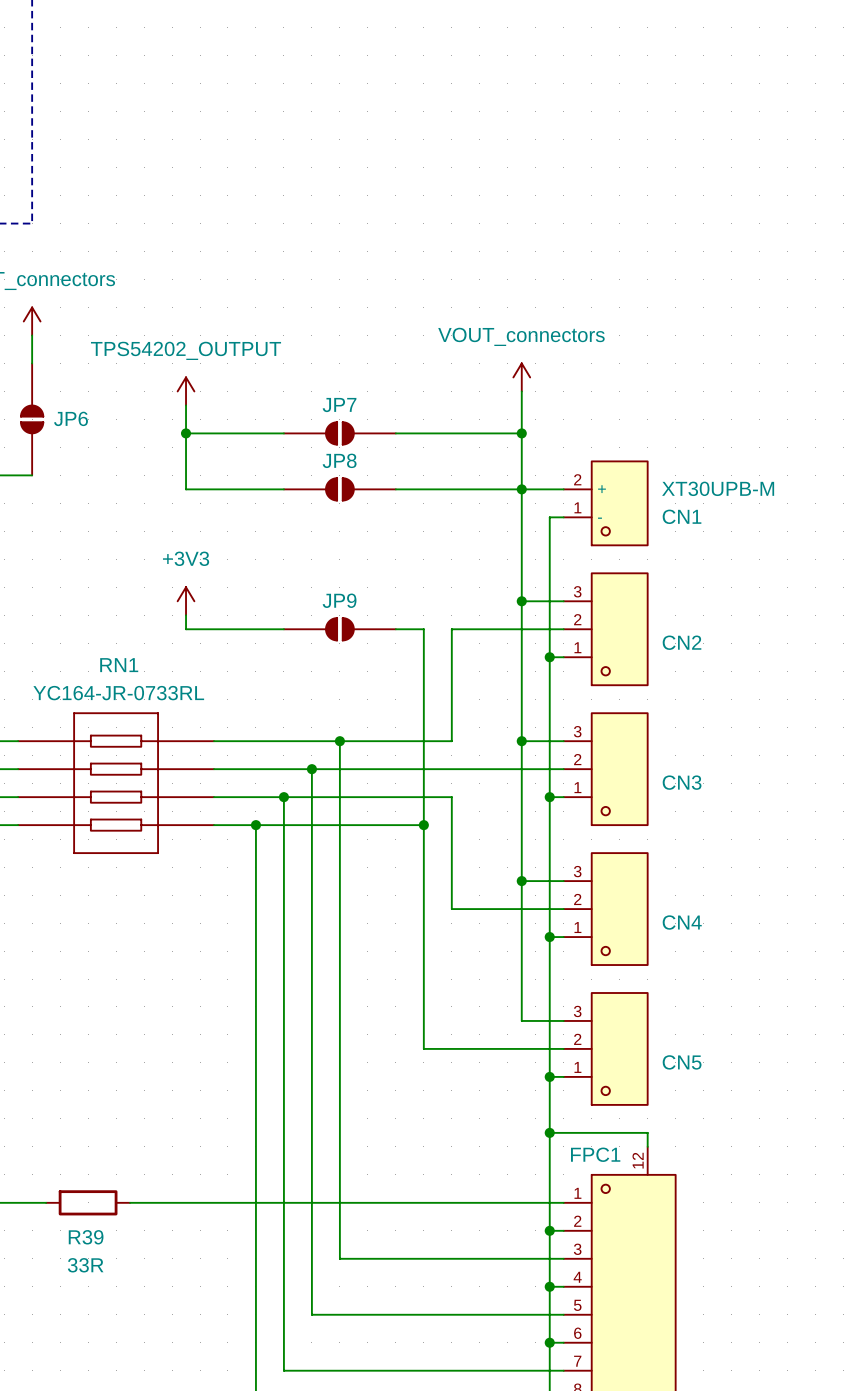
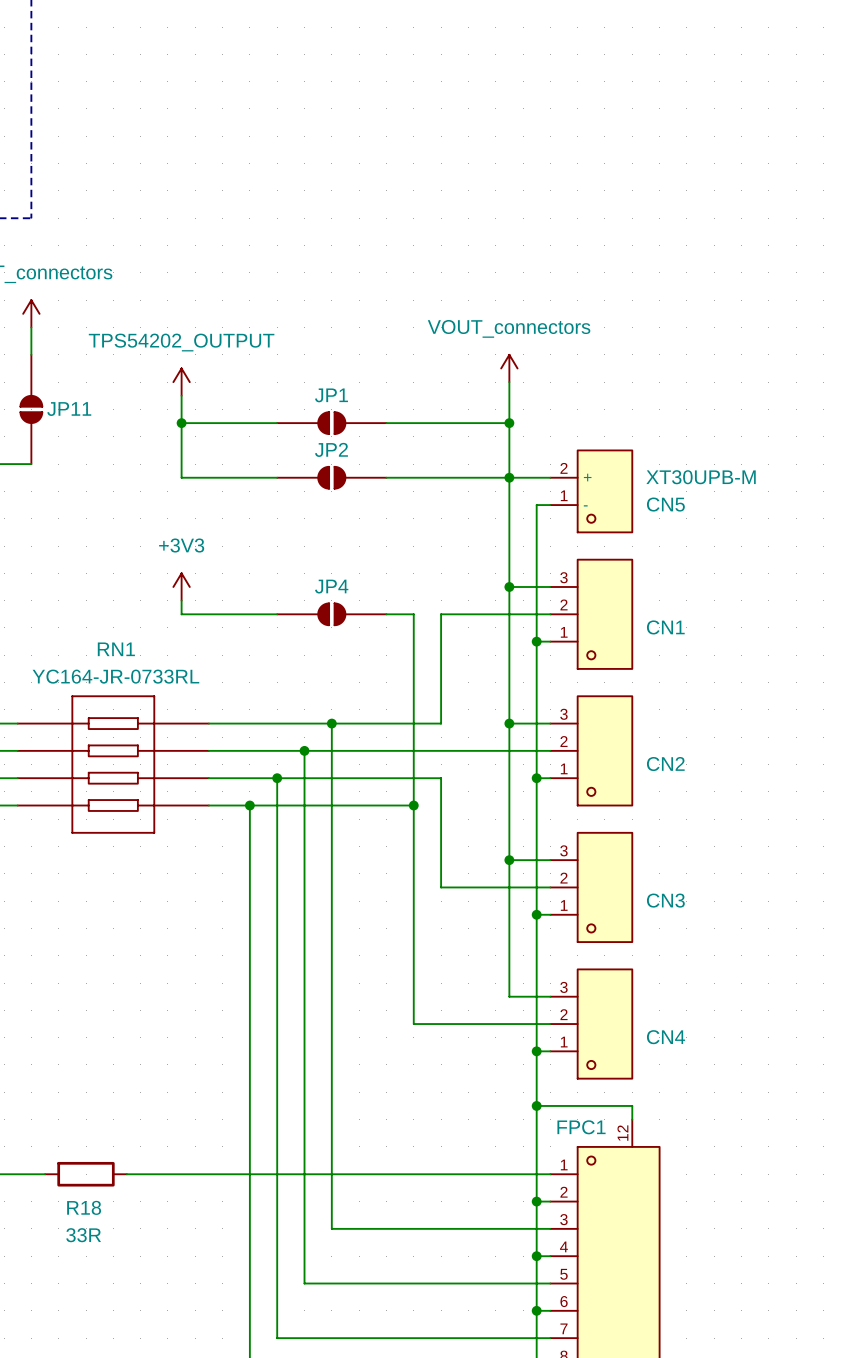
JP7 name: JP7 (339, 405) -> JP1 (331, 395)
JP6 name: JP6 (71, 418) -> JP11 (69, 409)
JP8 name: JP8 (339, 460) -> JP2 (331, 449)
CN1 name: CN1 (682, 516) -> CN5 (665, 504)
JP9 name: JP9 (339, 600) -> JP4 (331, 586)
CN2 name: CN2 (682, 642) -> CN1 (665, 627)
CN3 name: CN3 (682, 782) -> CN2 (665, 764)
CN4 name: CN4 (682, 922) -> CN3 (665, 900)
CN5 name: CN5 (682, 1062) -> CN4 (666, 1037)
R39 name: R39 (86, 1237) -> R18 (84, 1207)

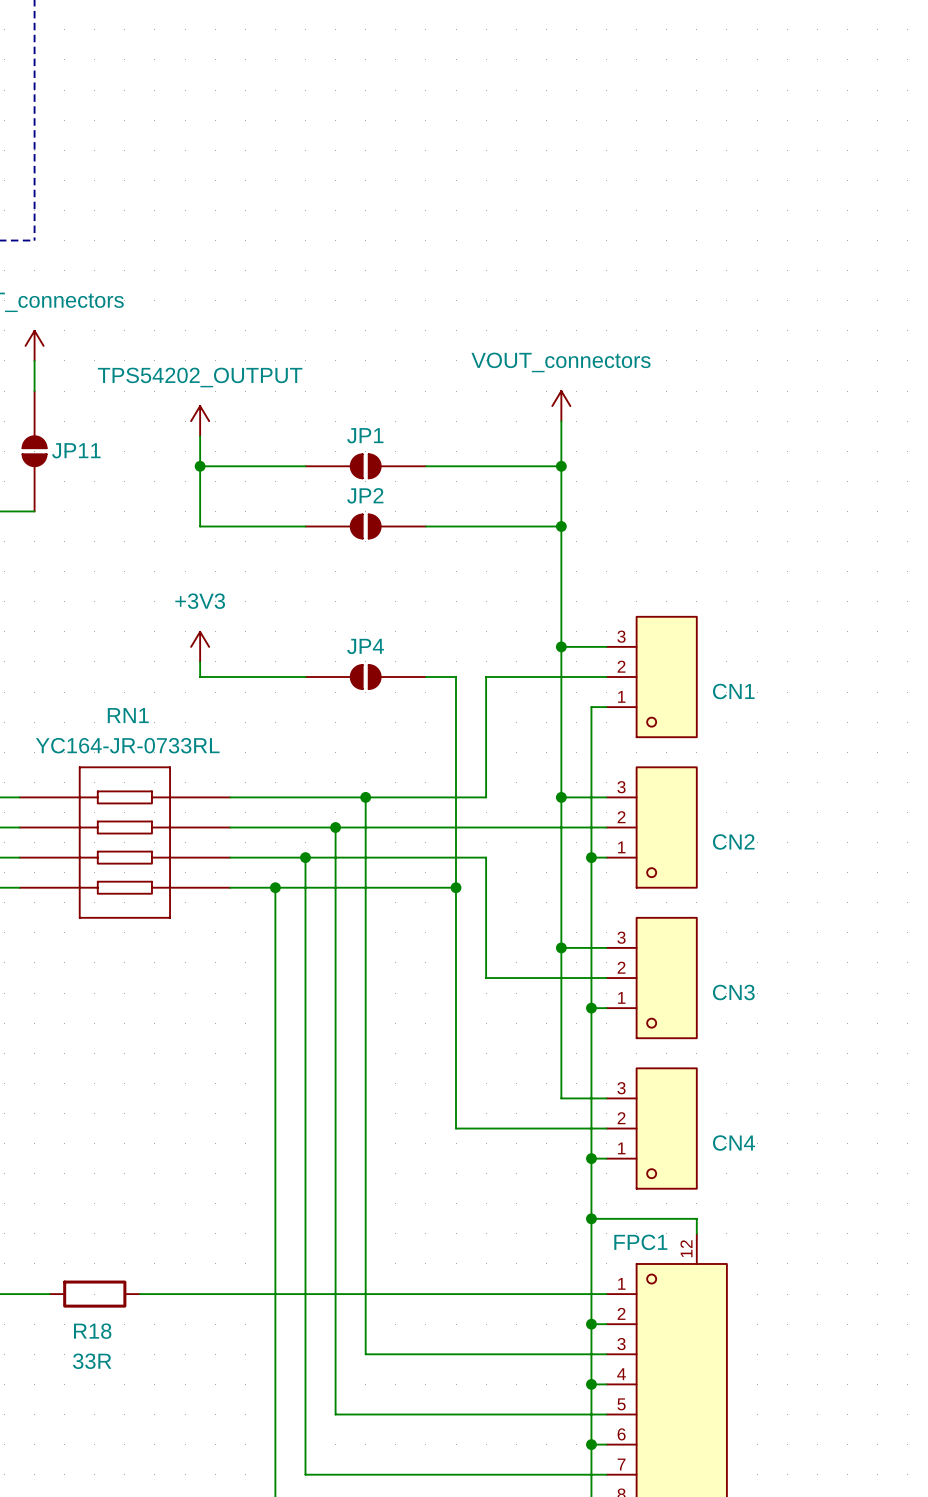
wire: (509, 477) (550, 477) -> none
CN5: XT30UPB-M (591, 491) -> none
wire: (550, 505) (536, 505) (536, 641) -> none
junction: (536, 641) -> none

